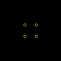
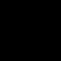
part: (30, 30) -> none

